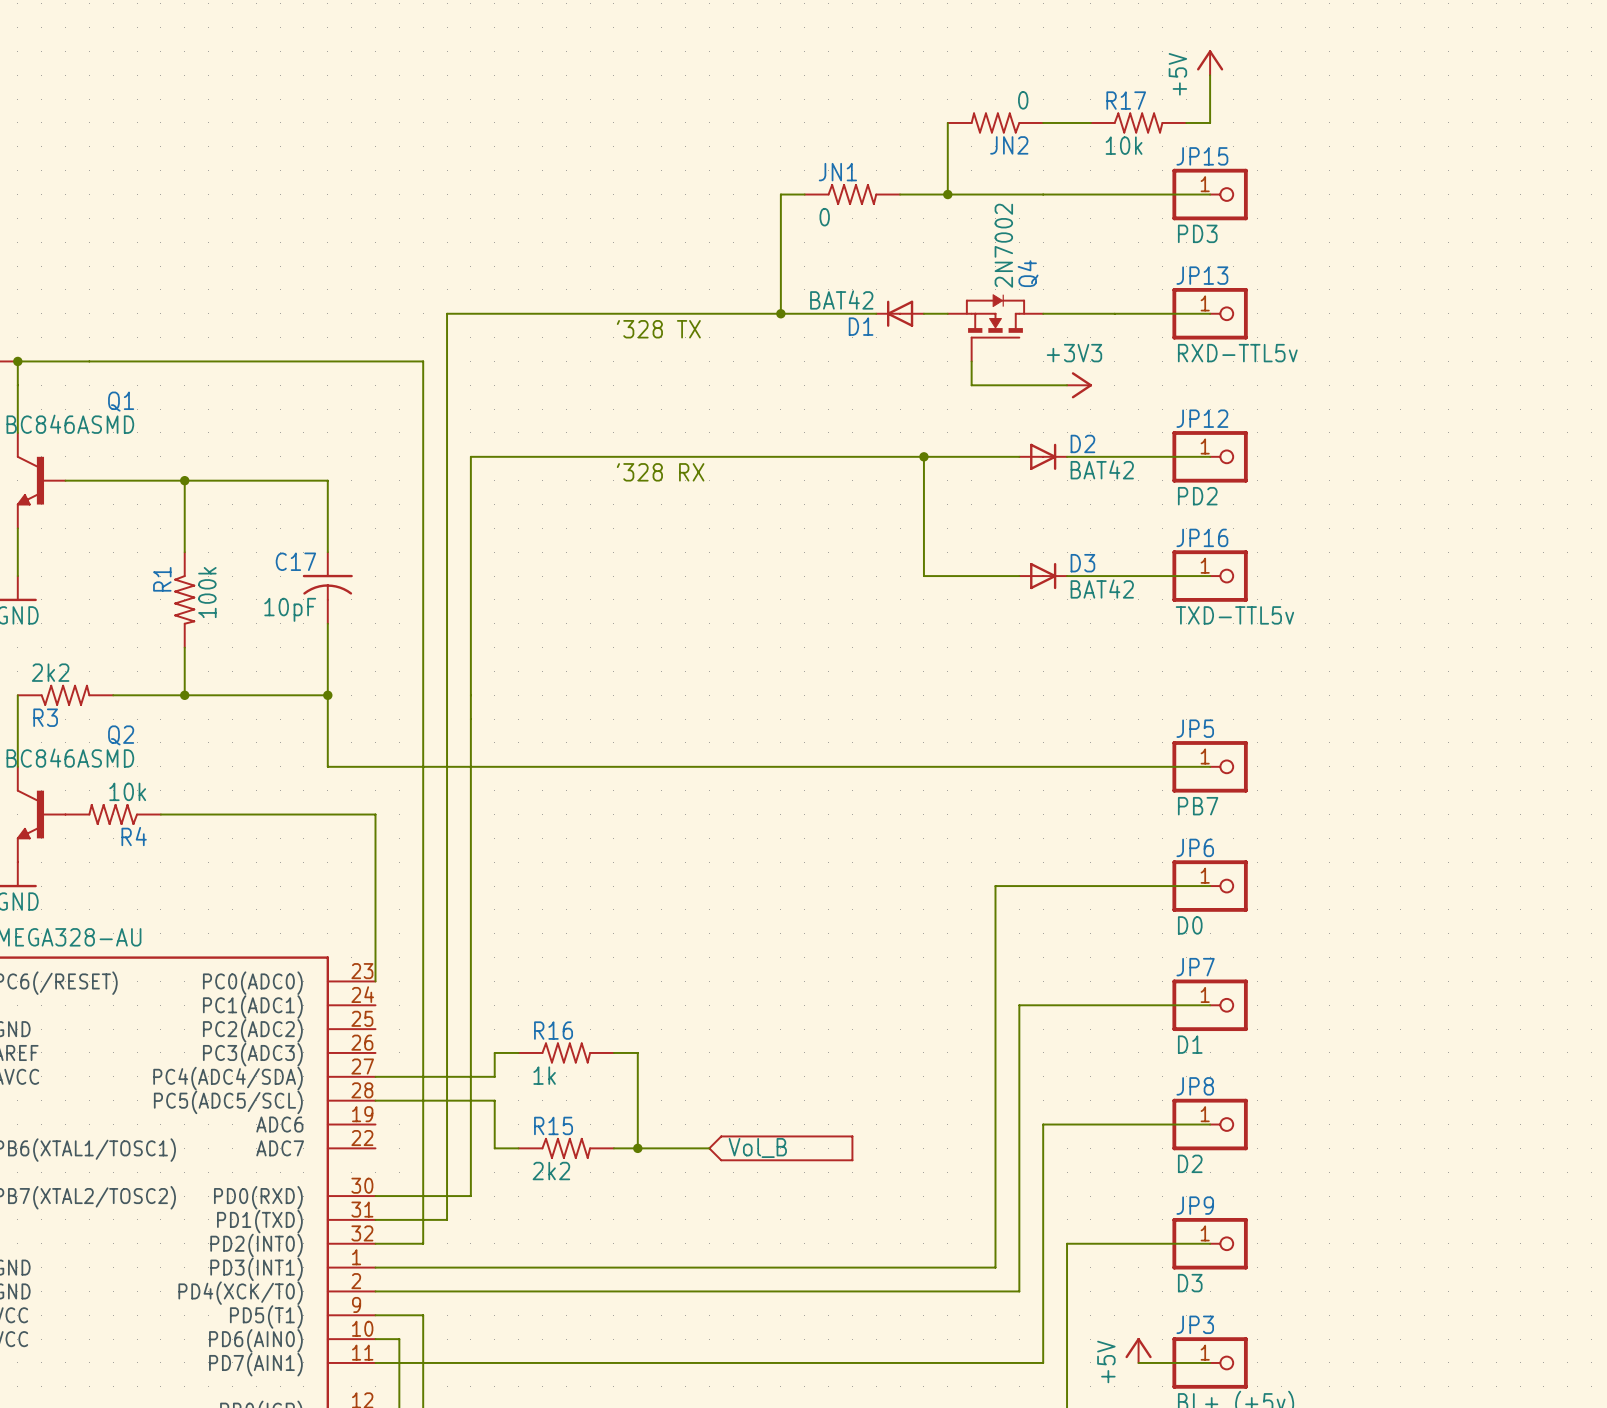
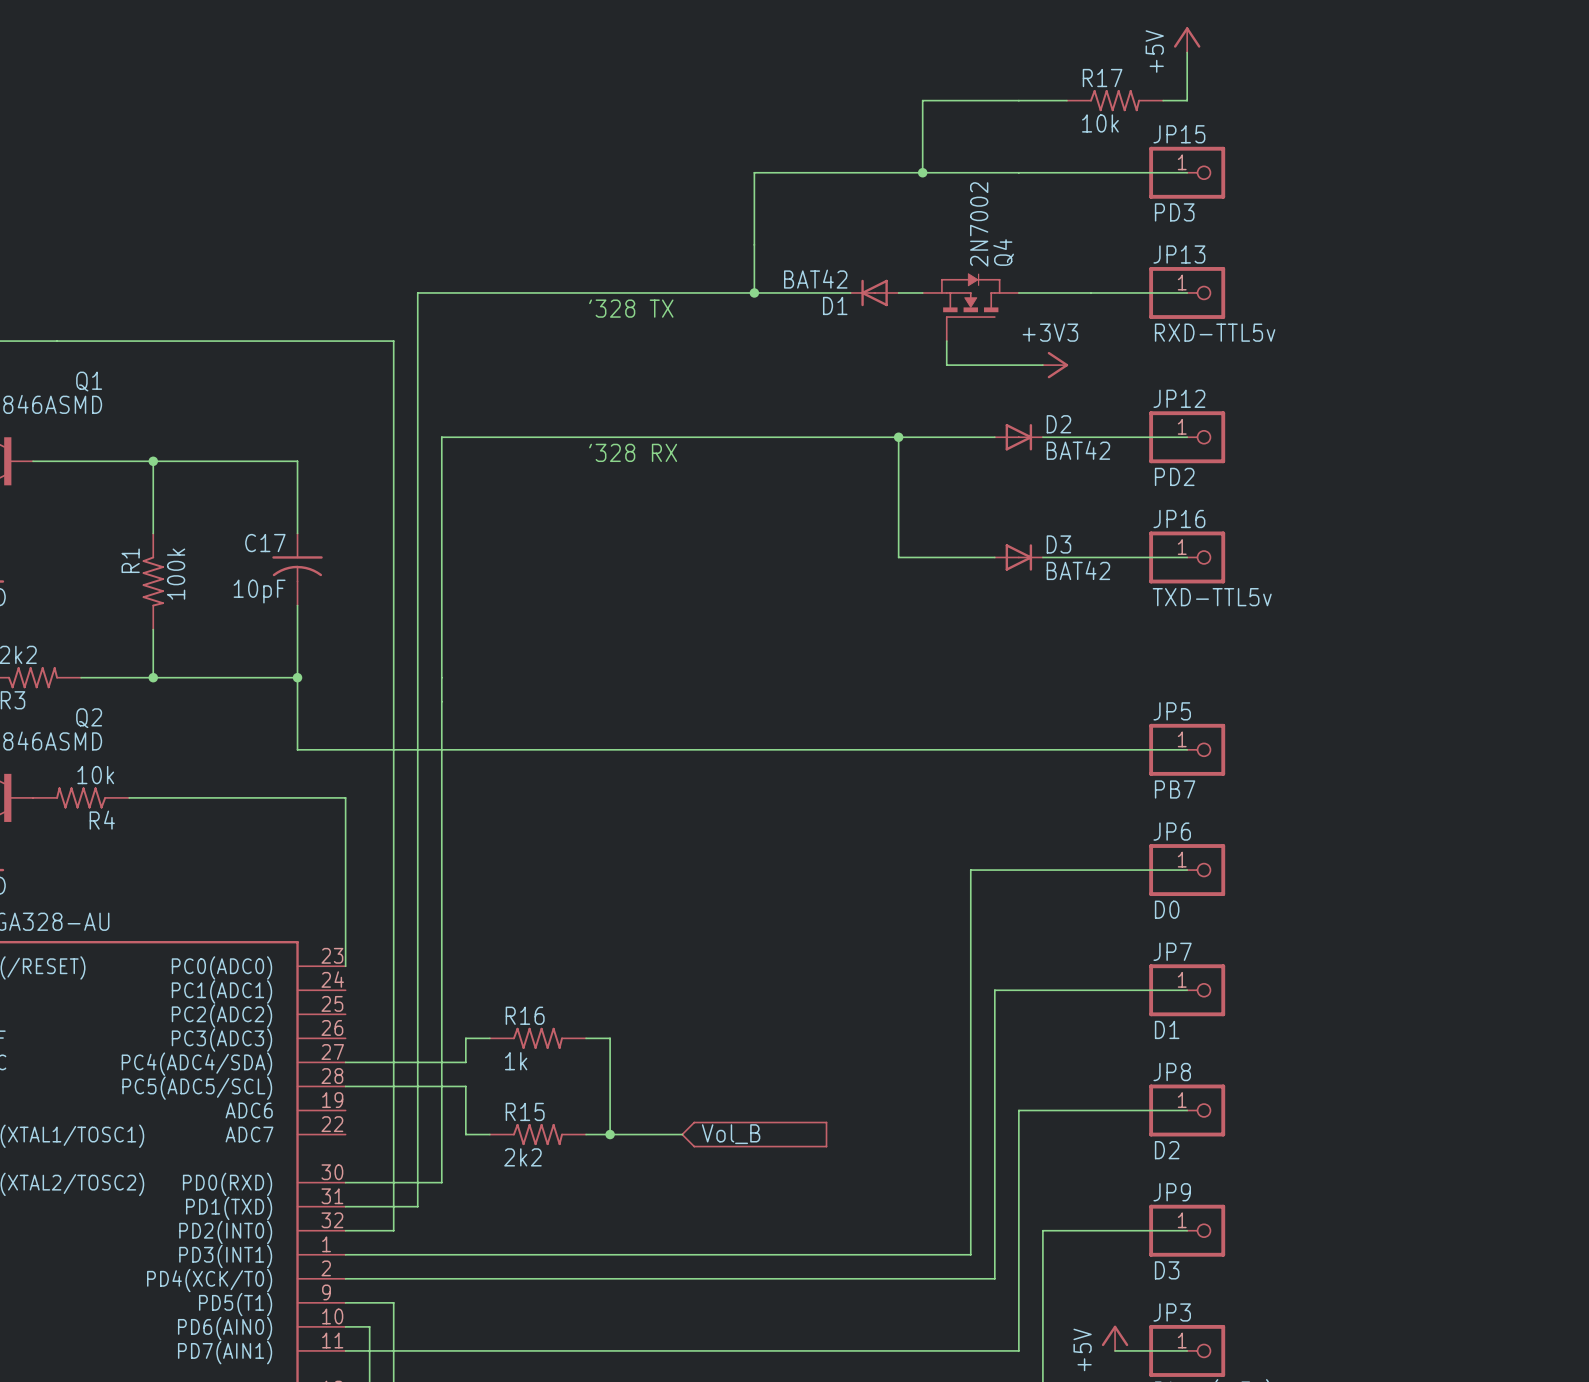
JN2: 0 (995, 122) -> none
JN1: 0 (852, 194) -> none

